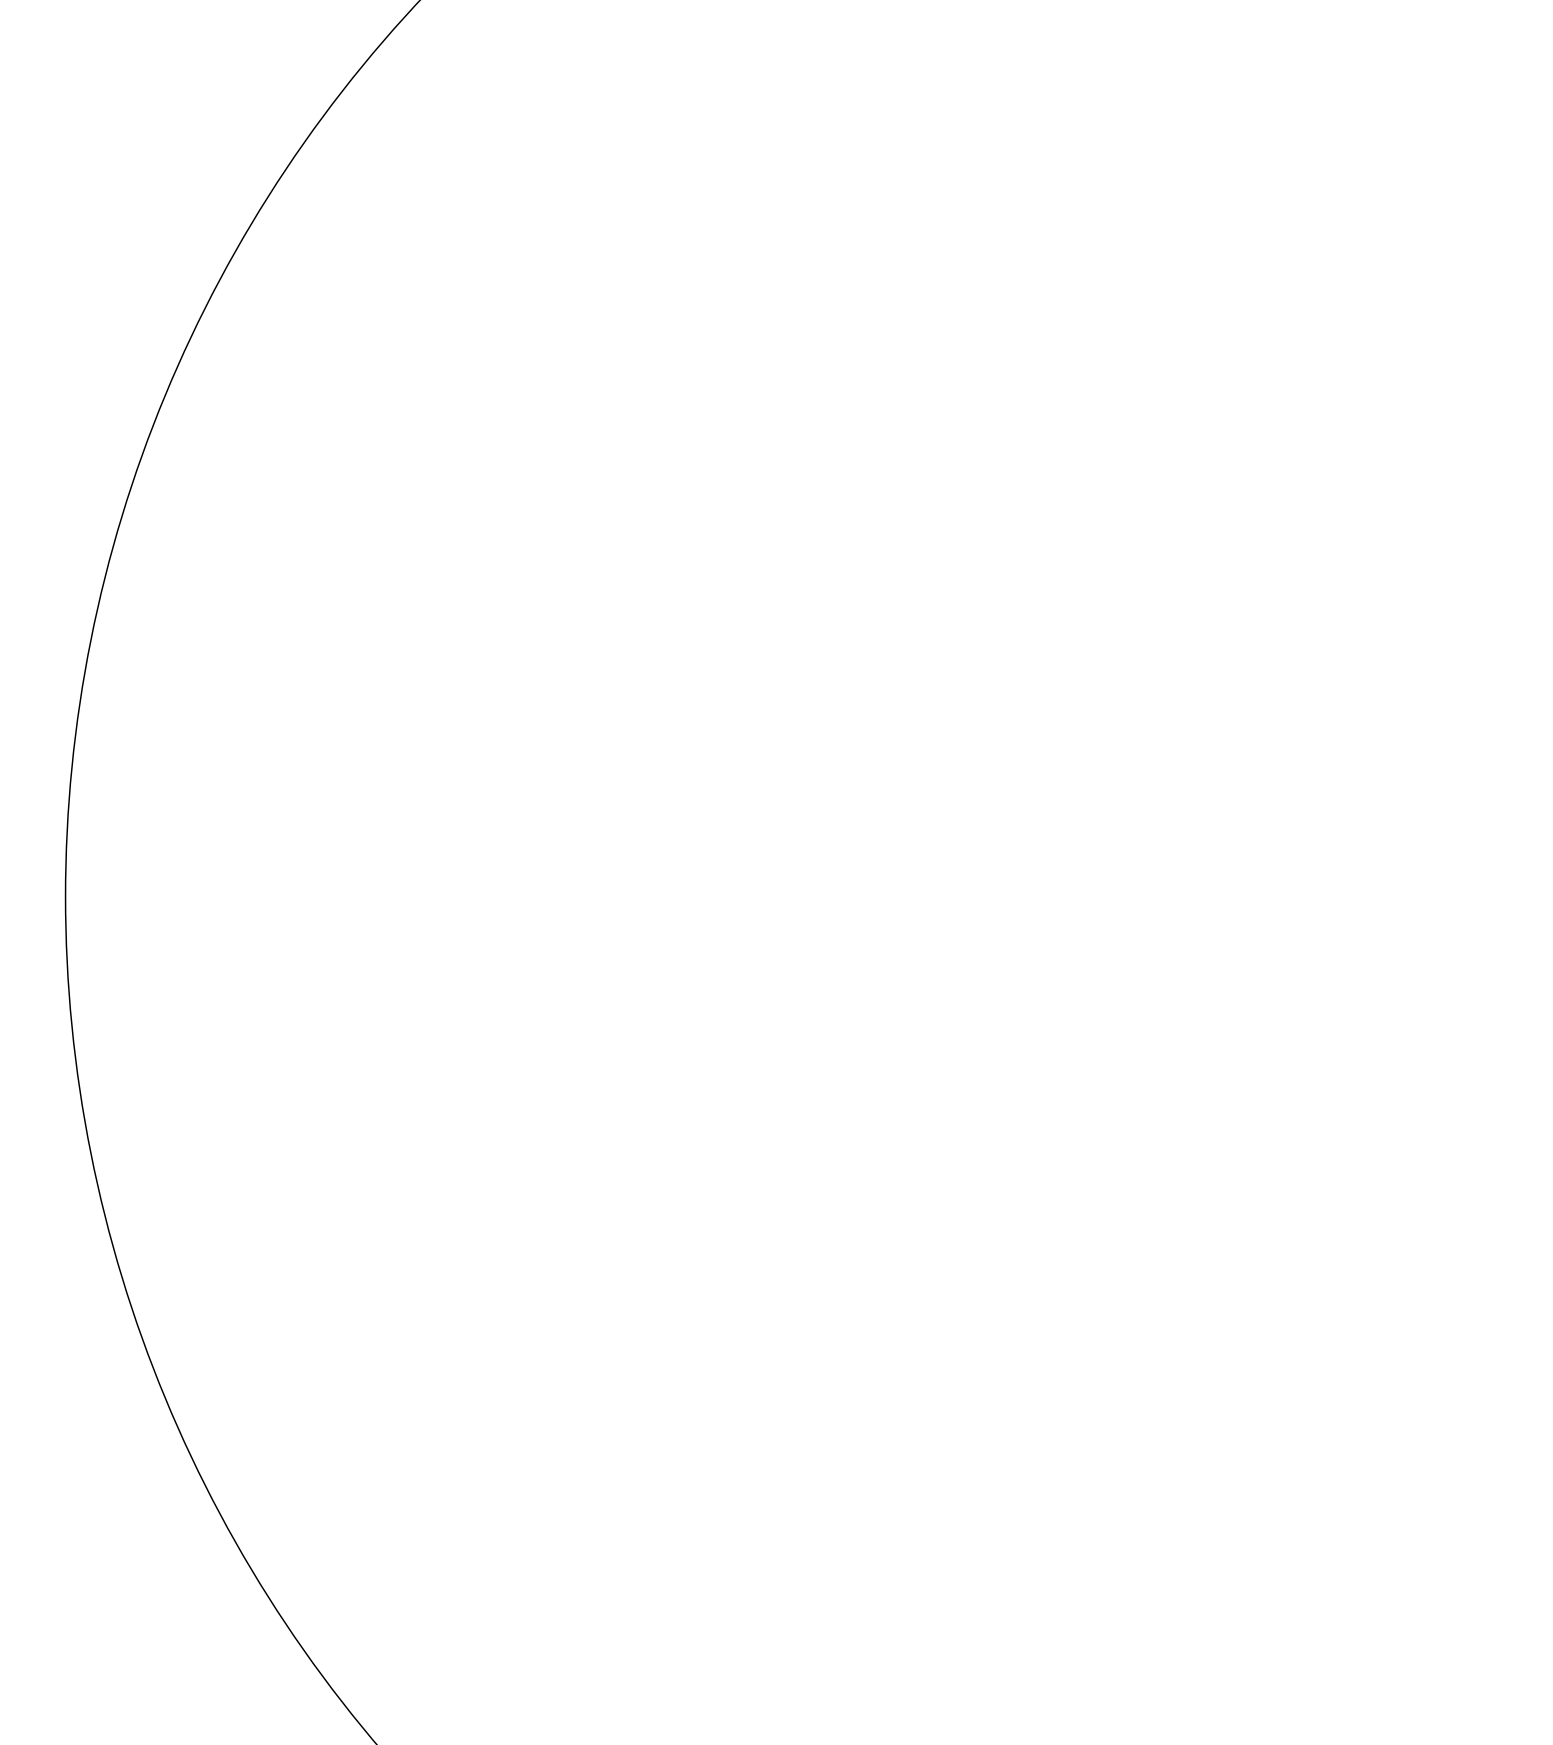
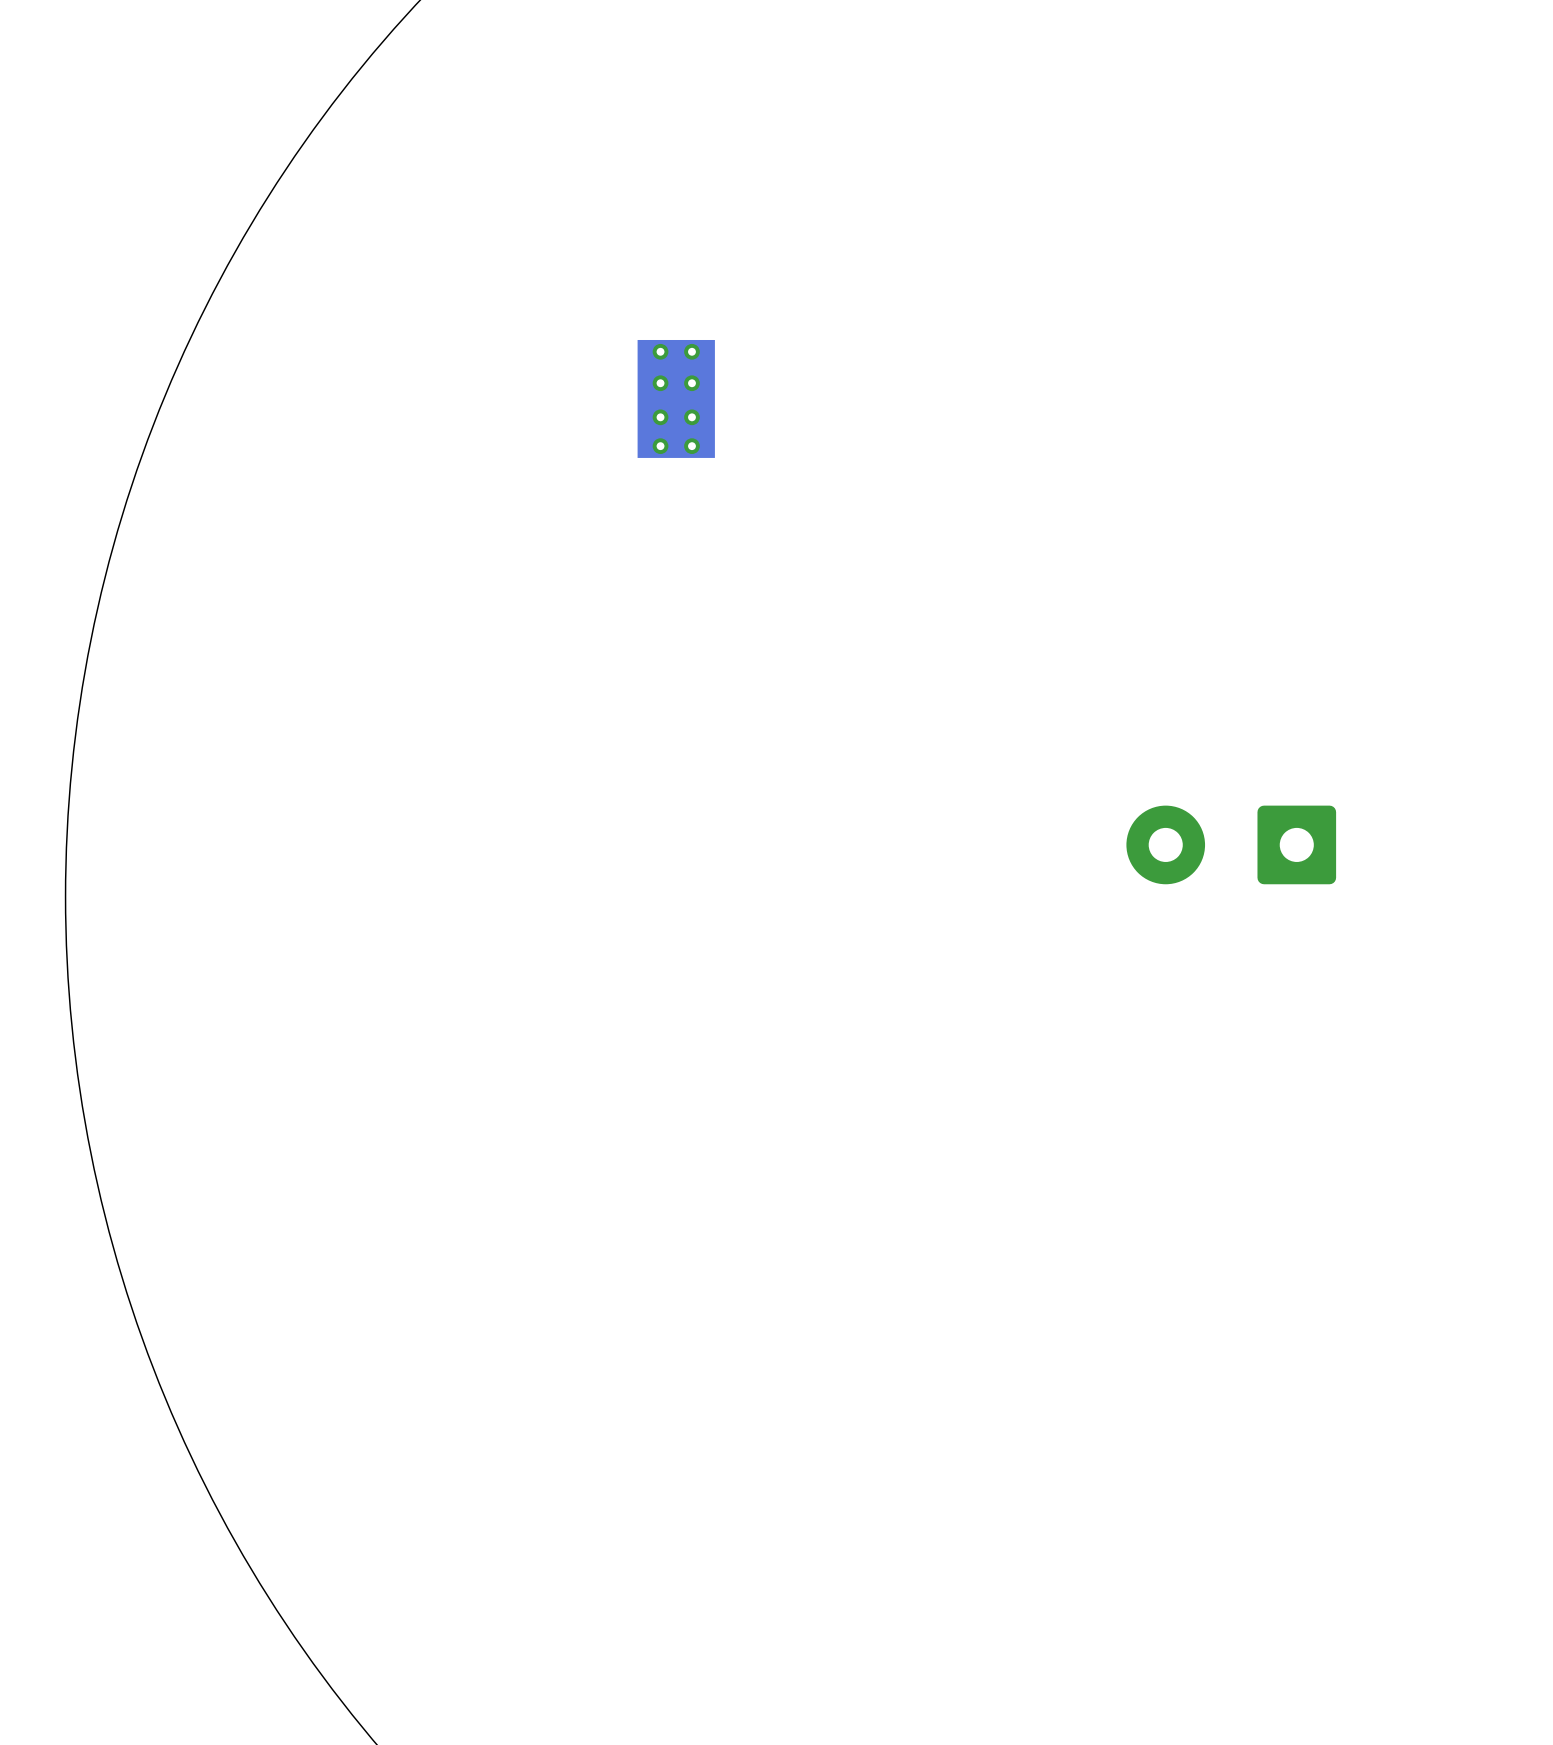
part: none -> (676, 398)
part: none -> (1231, 844)

